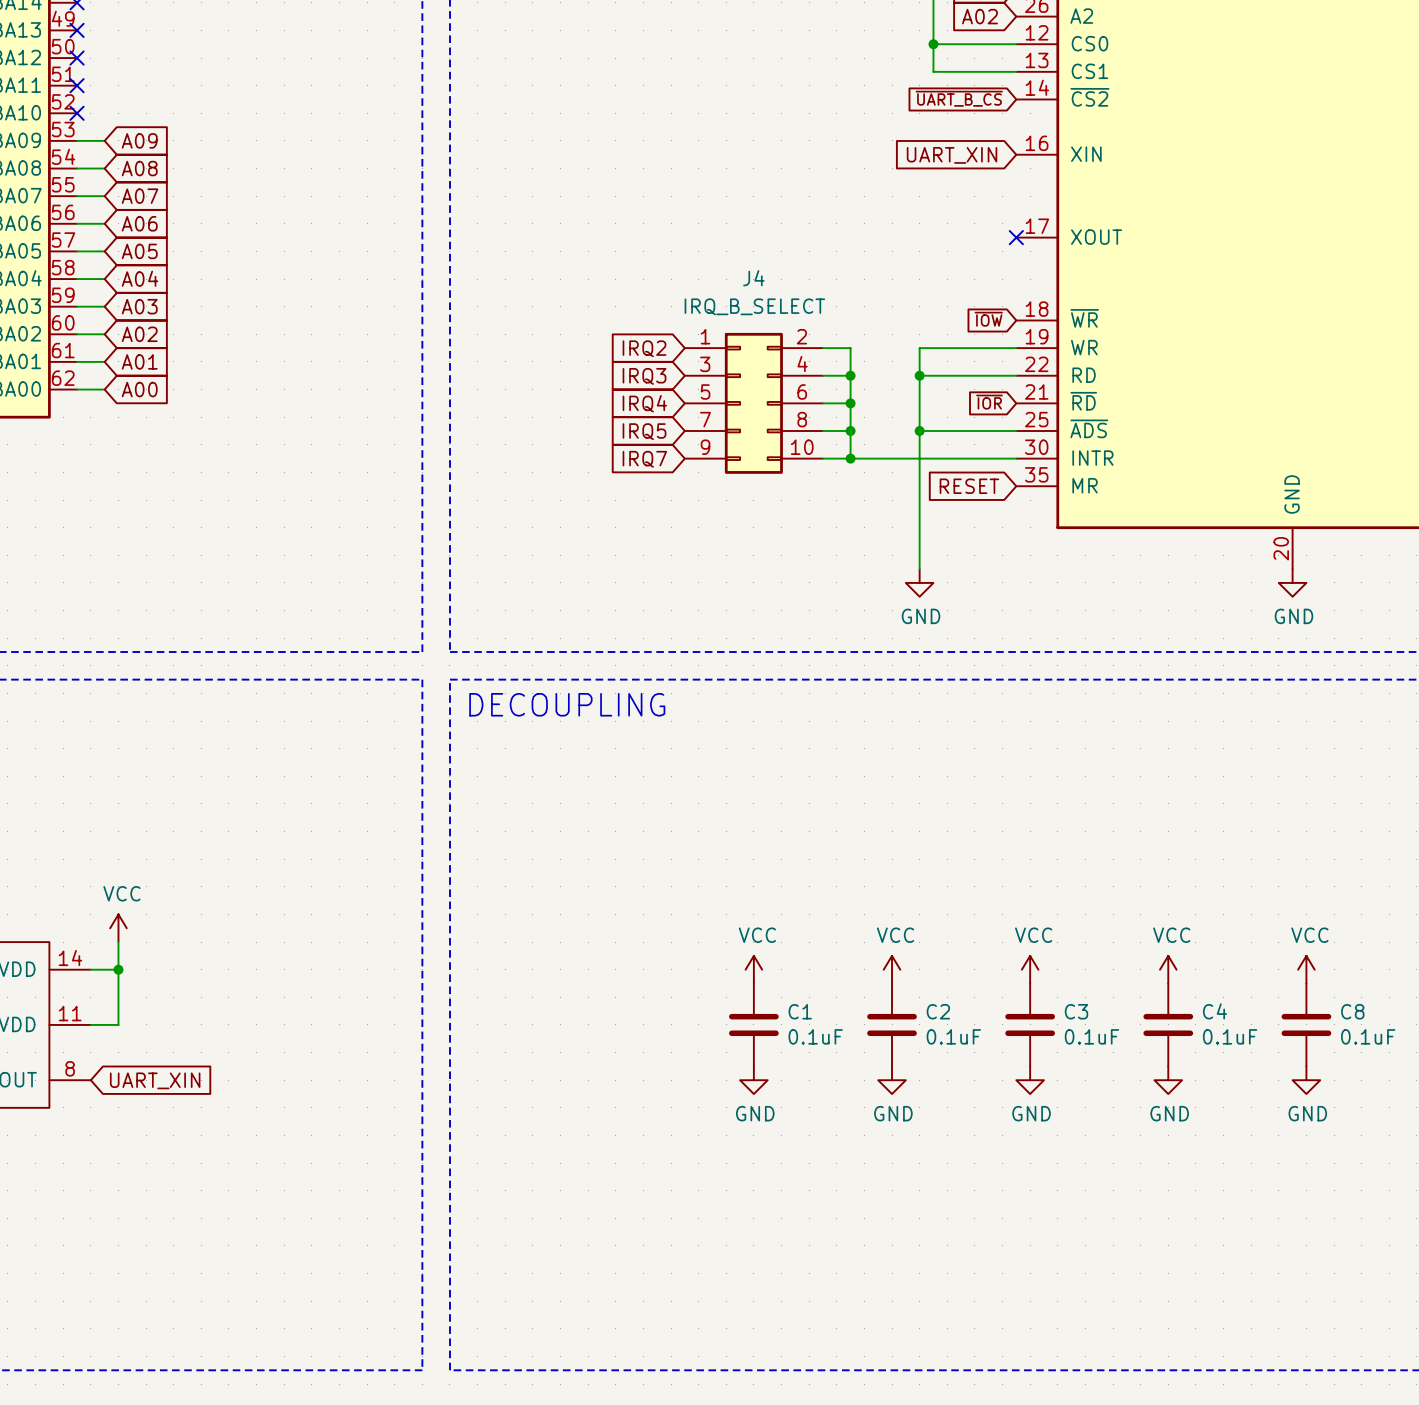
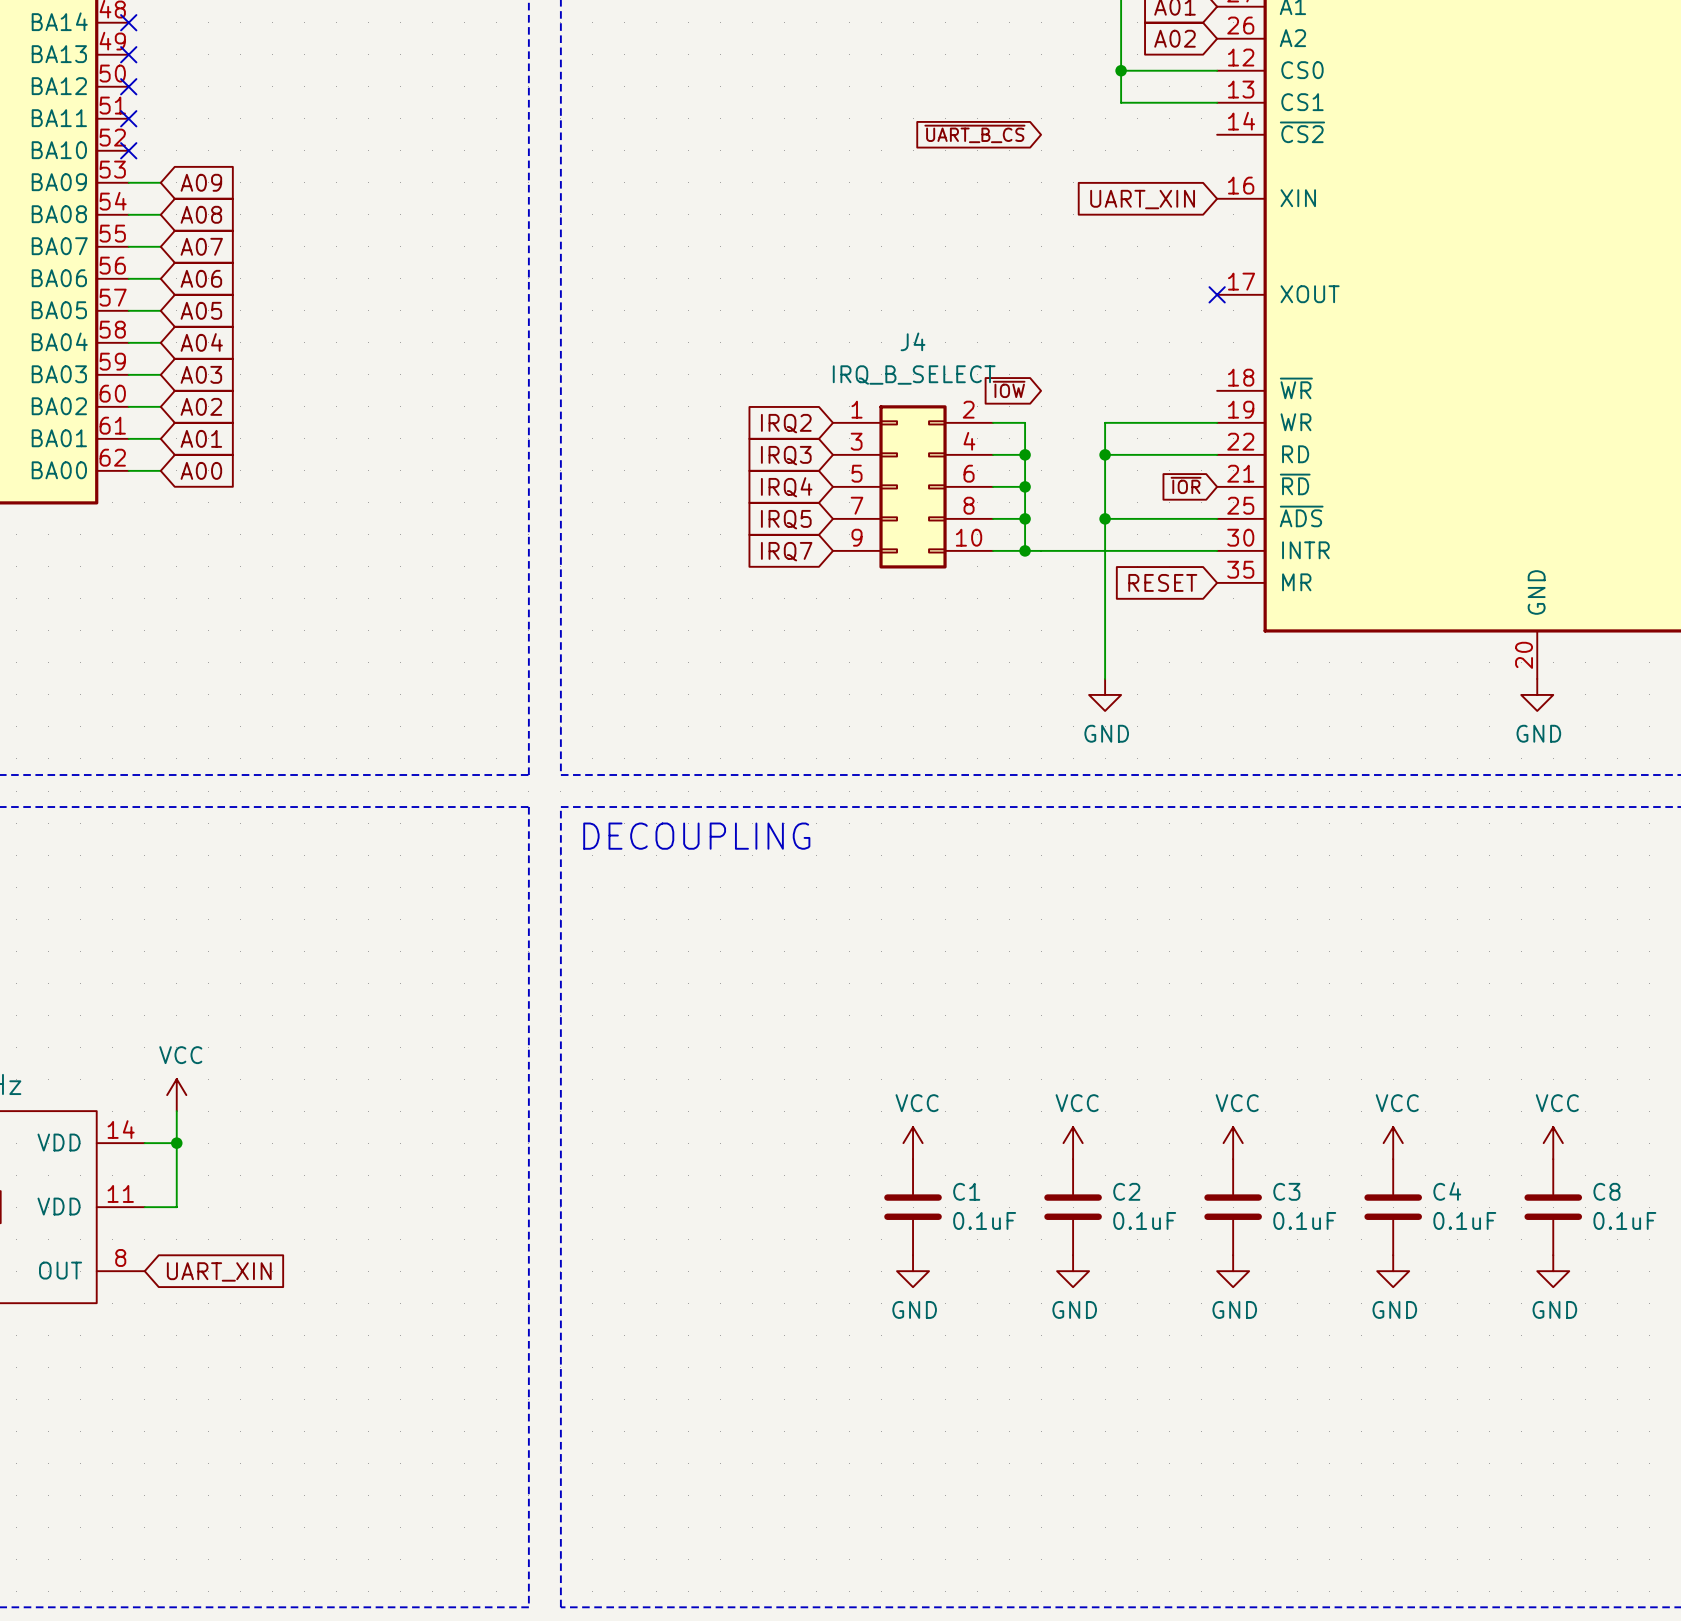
global label position: ~{UART_B_CS} (959, 98) -> ~{UART_B_CS} (974, 133)
global label position: ~{IOW} (988, 319) -> ~{IOW} (1009, 389)

